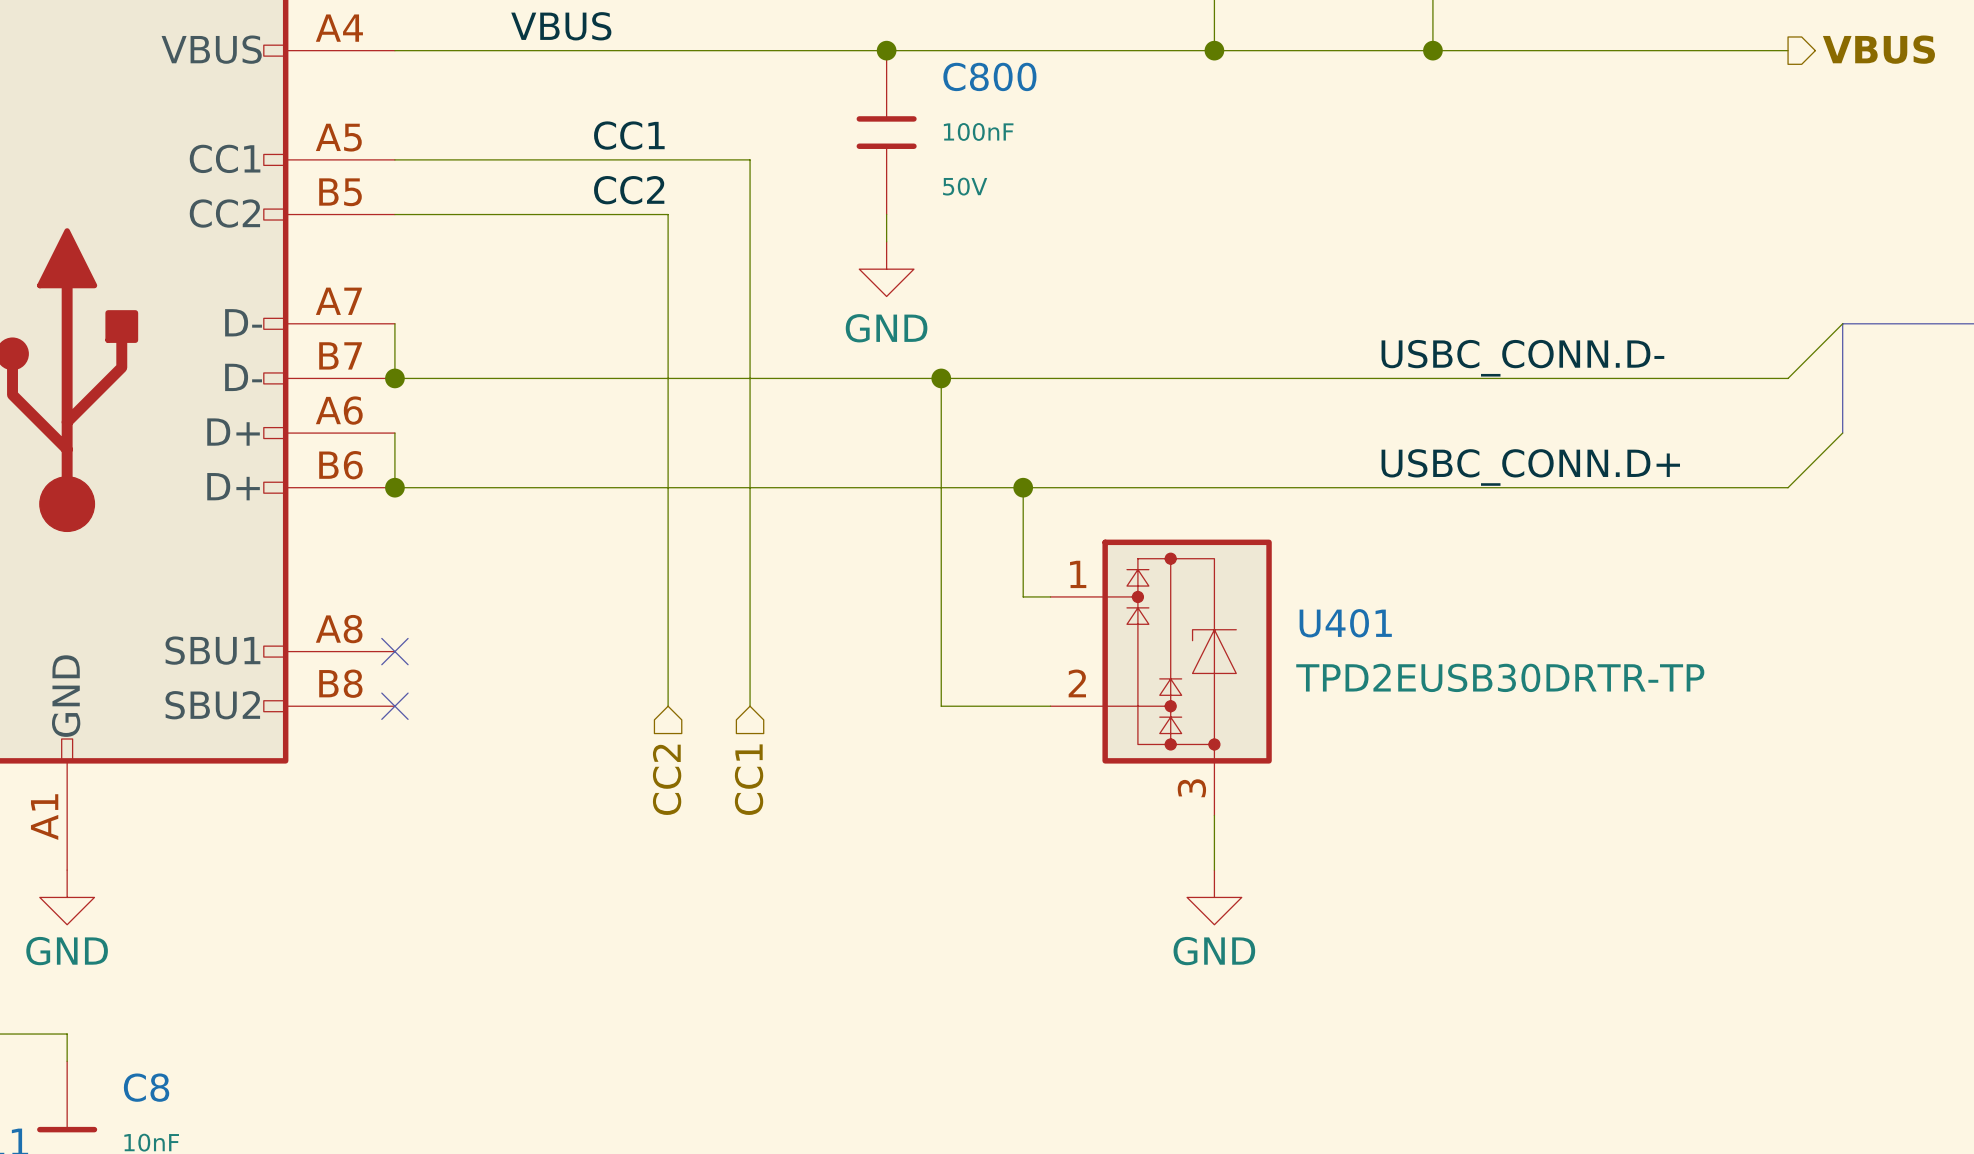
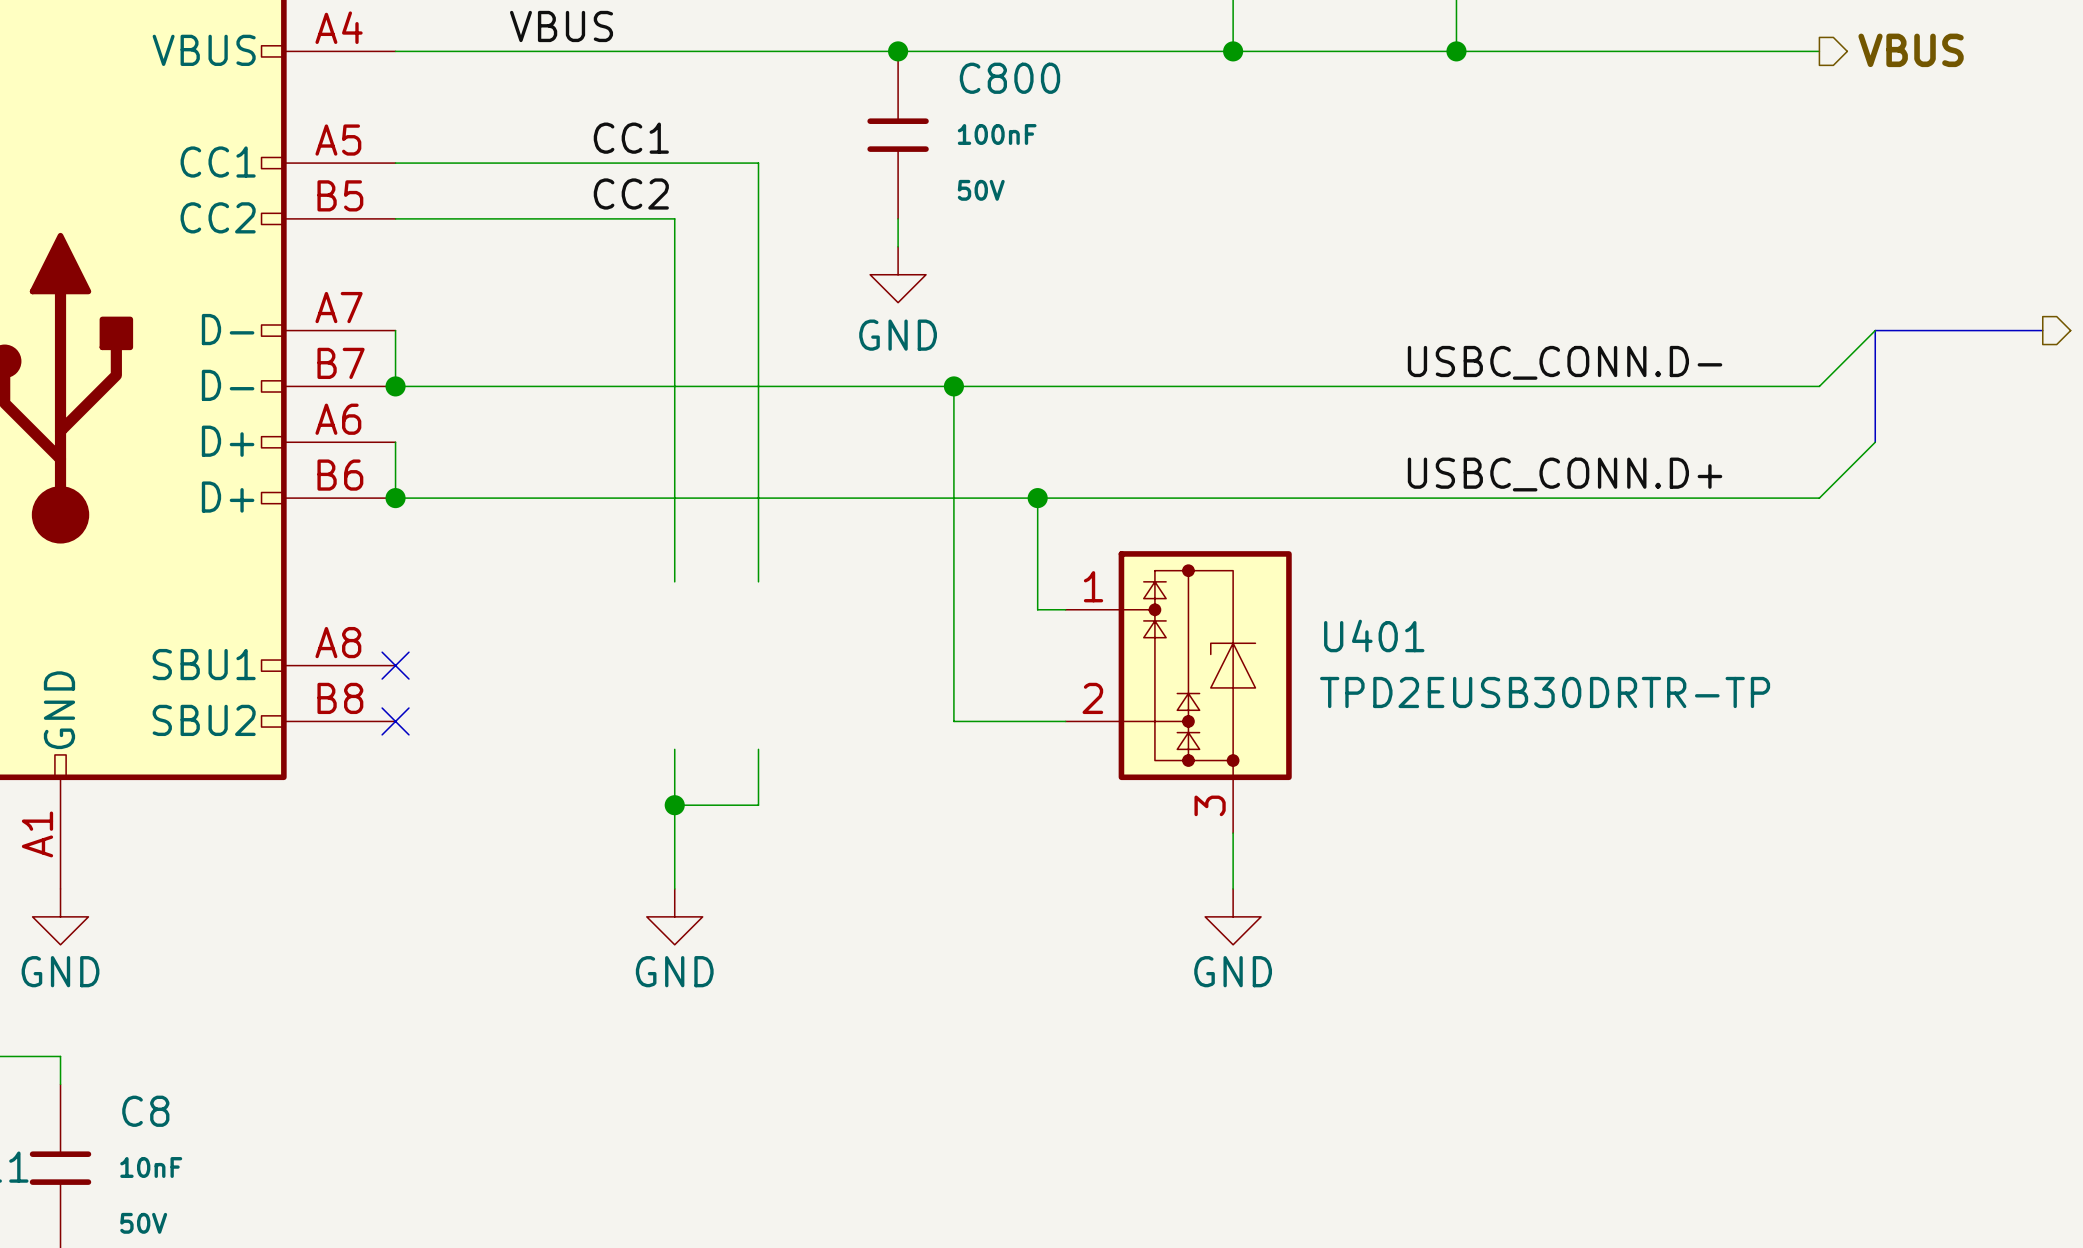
wire: (668, 569) (668, 706) -> (674, 749) (674, 888)
wire: (750, 569) (750, 706) -> none
wire: none -> (758, 749) (758, 805) (674, 805)
hierarchical label: CC2 (667, 779) -> none
hierarchical label: CC1 (749, 779) -> none
junction: none -> (674, 805)
power symbol: none -> GND (674, 916)

